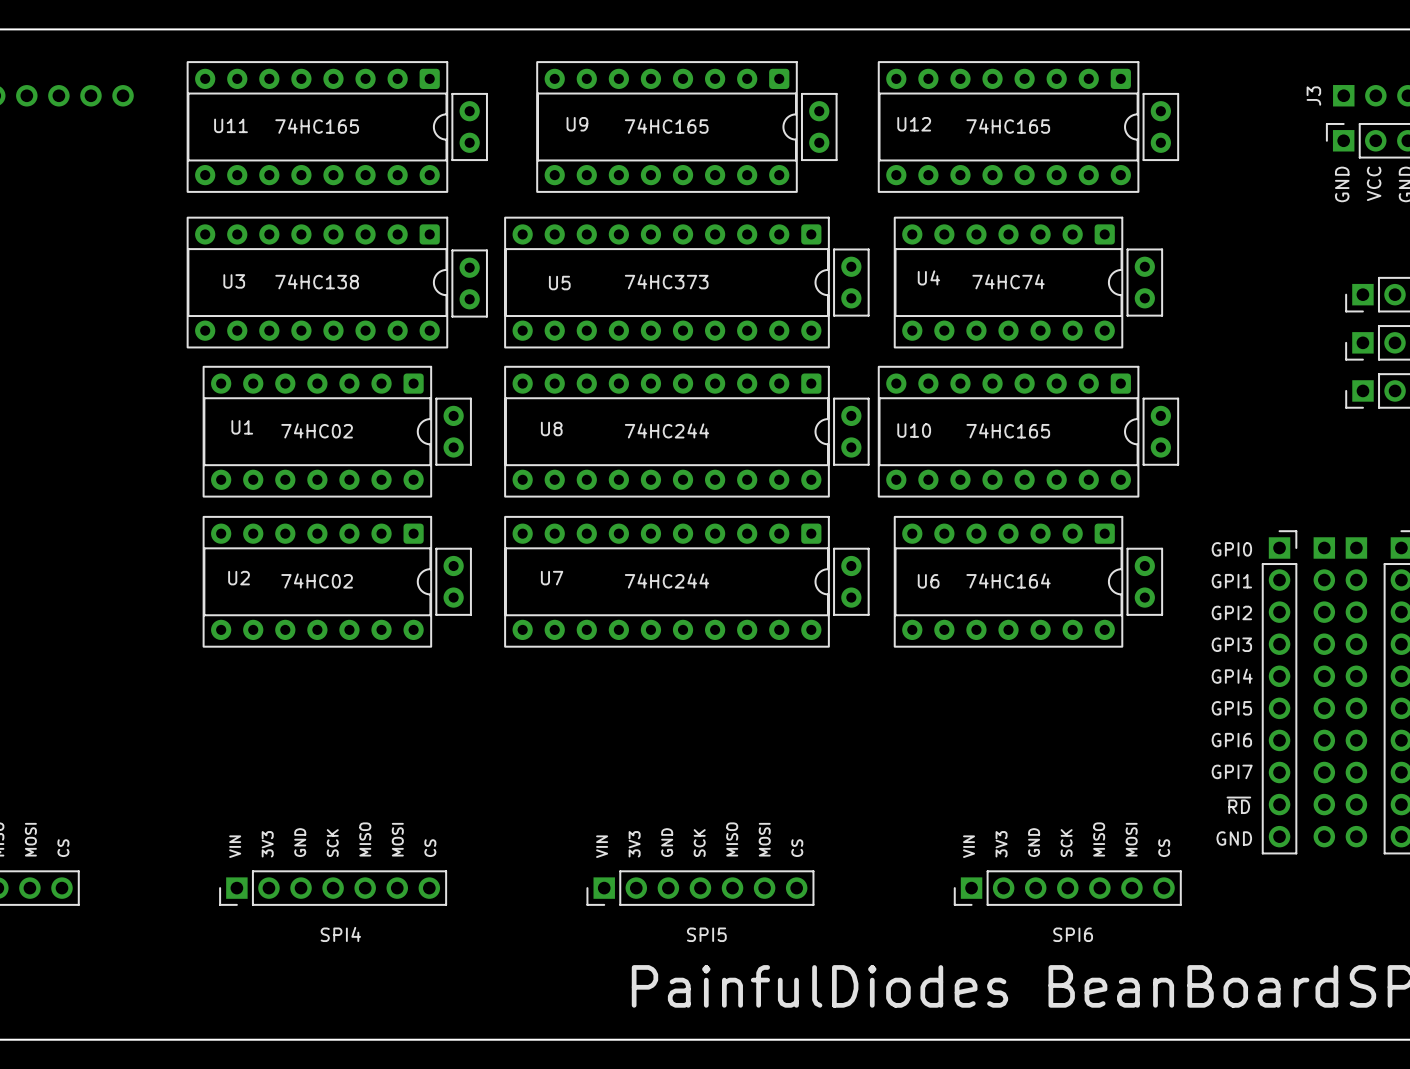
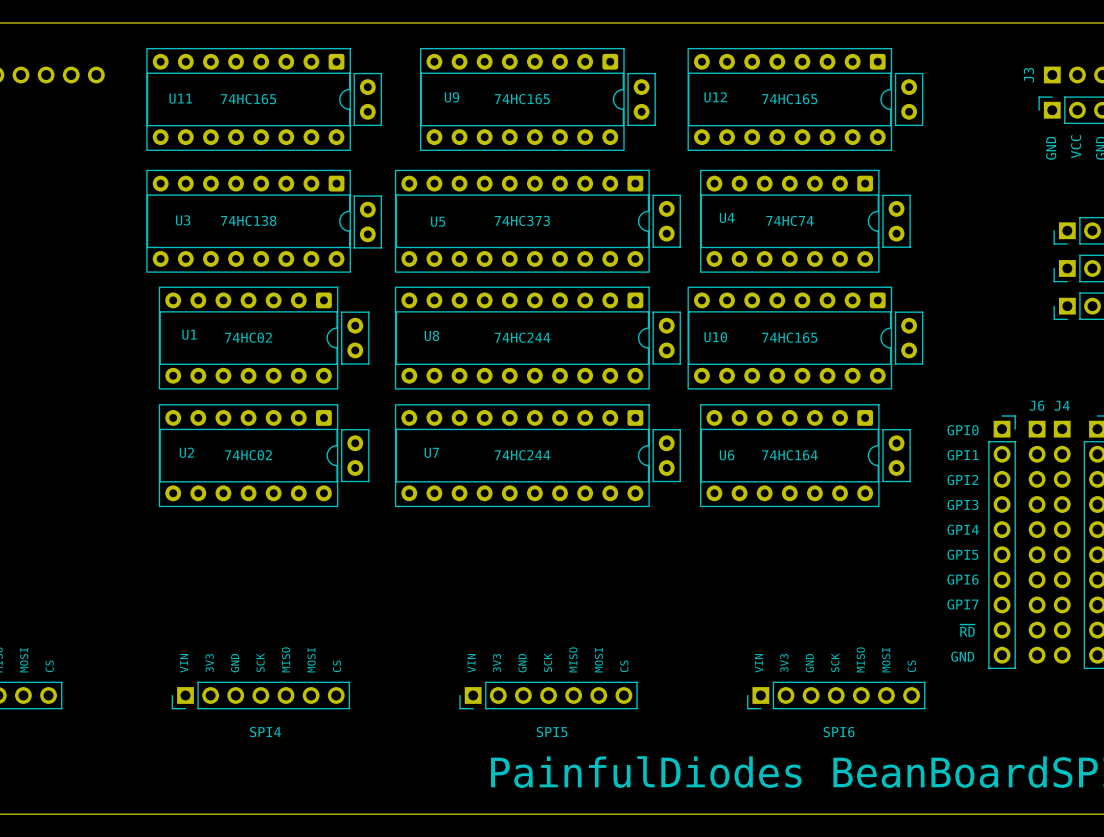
J4 name: none -> J4 (1062, 405)
J6 name: none -> J6 (1037, 405)

